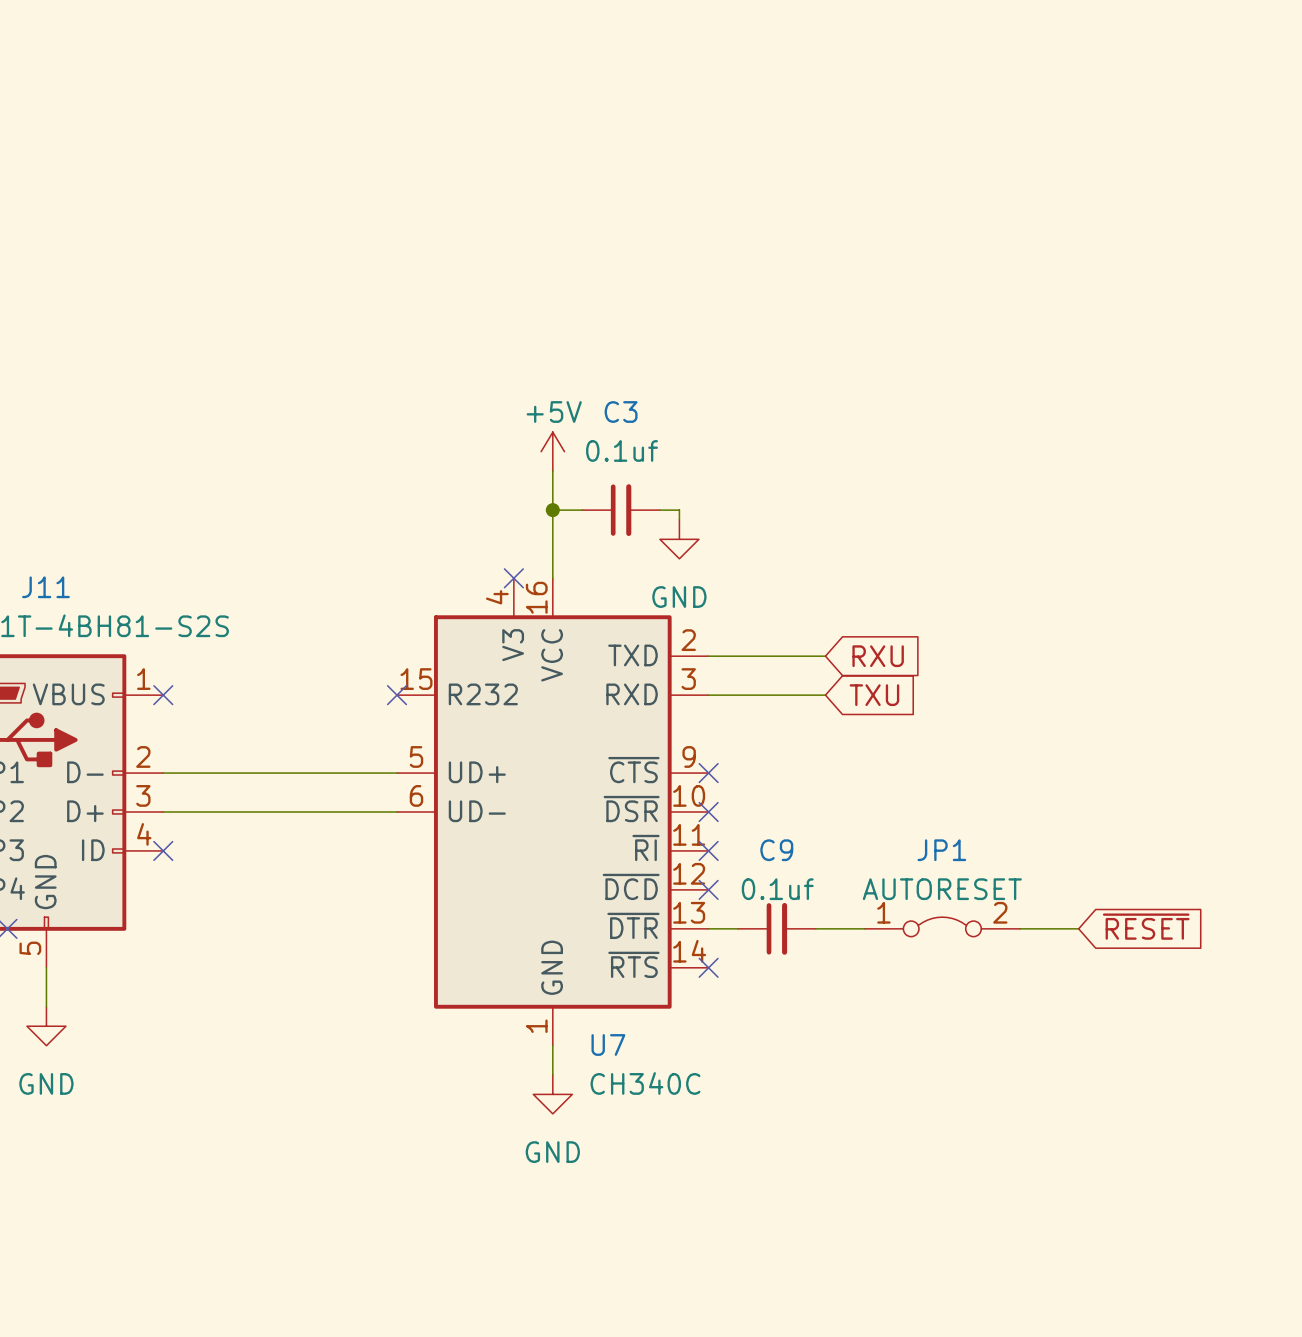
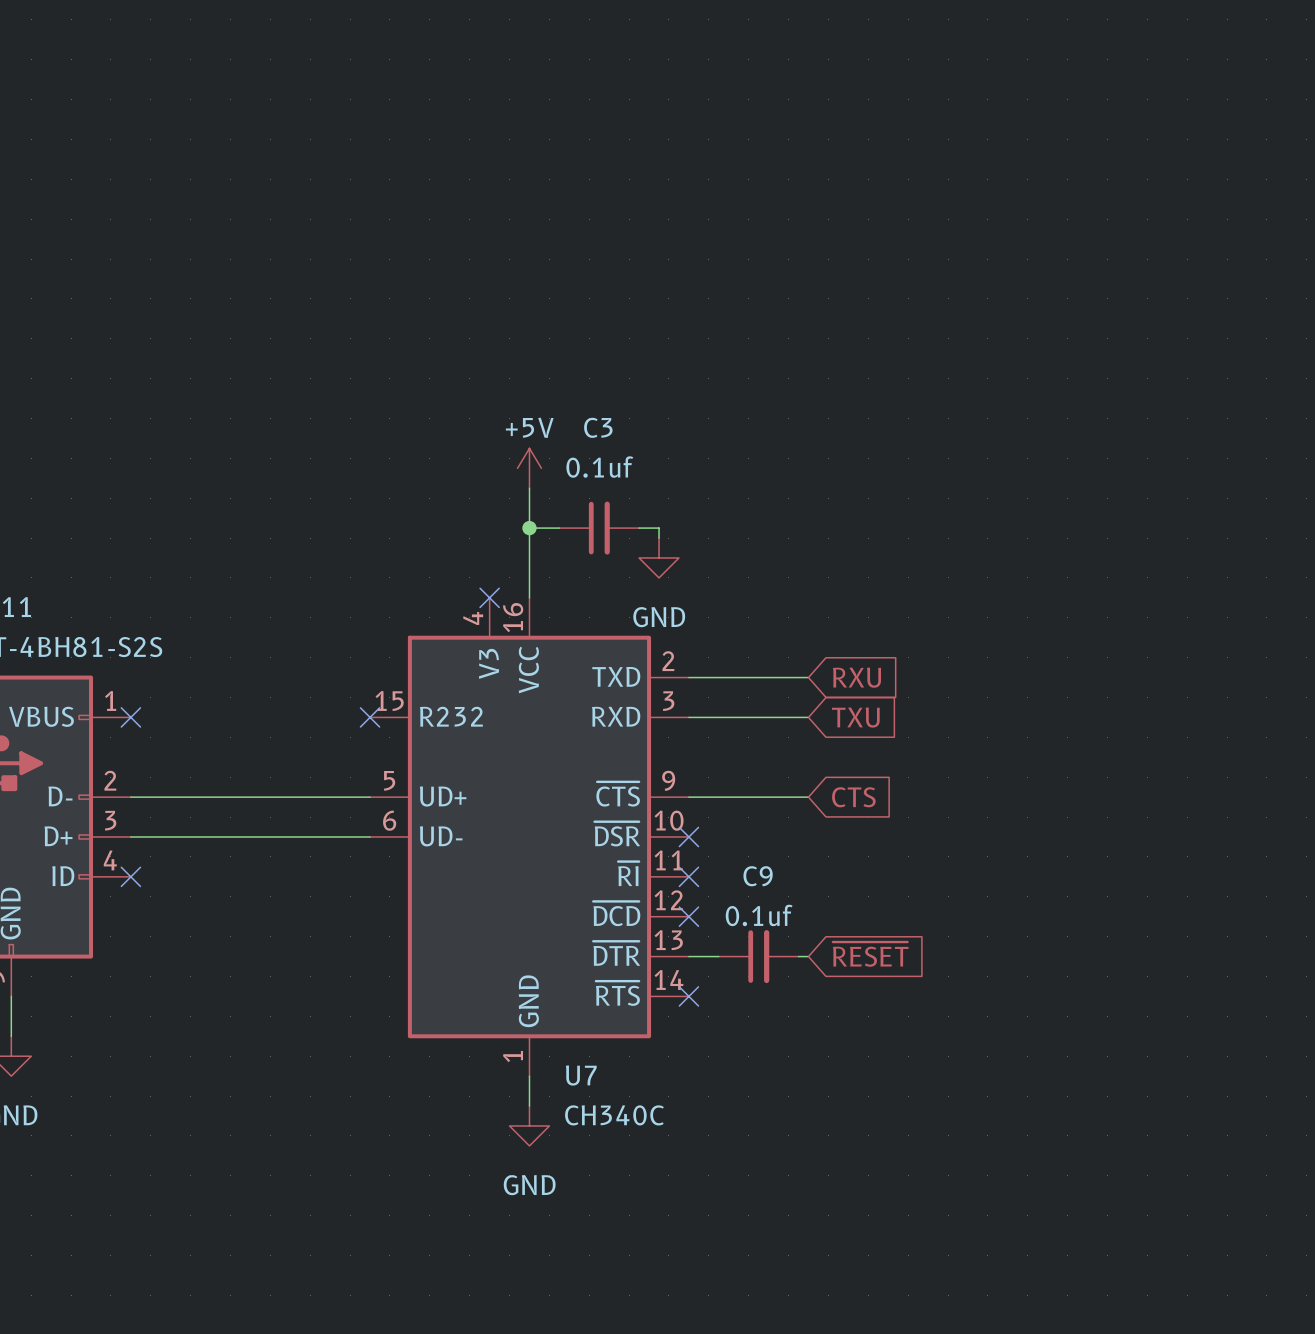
wire: none -> (688, 797) (808, 797)
no-connect mark: (708, 773) -> none
global label: none -> CTS (853, 797)
JP1: AUTORESET (942, 926) -> none
global label position: ~{RESET} (1146, 926) -> ~{RESET} (870, 954)
wire: (825, 928) (864, 928) -> none
wire: (1020, 928) (1078, 928) -> none

